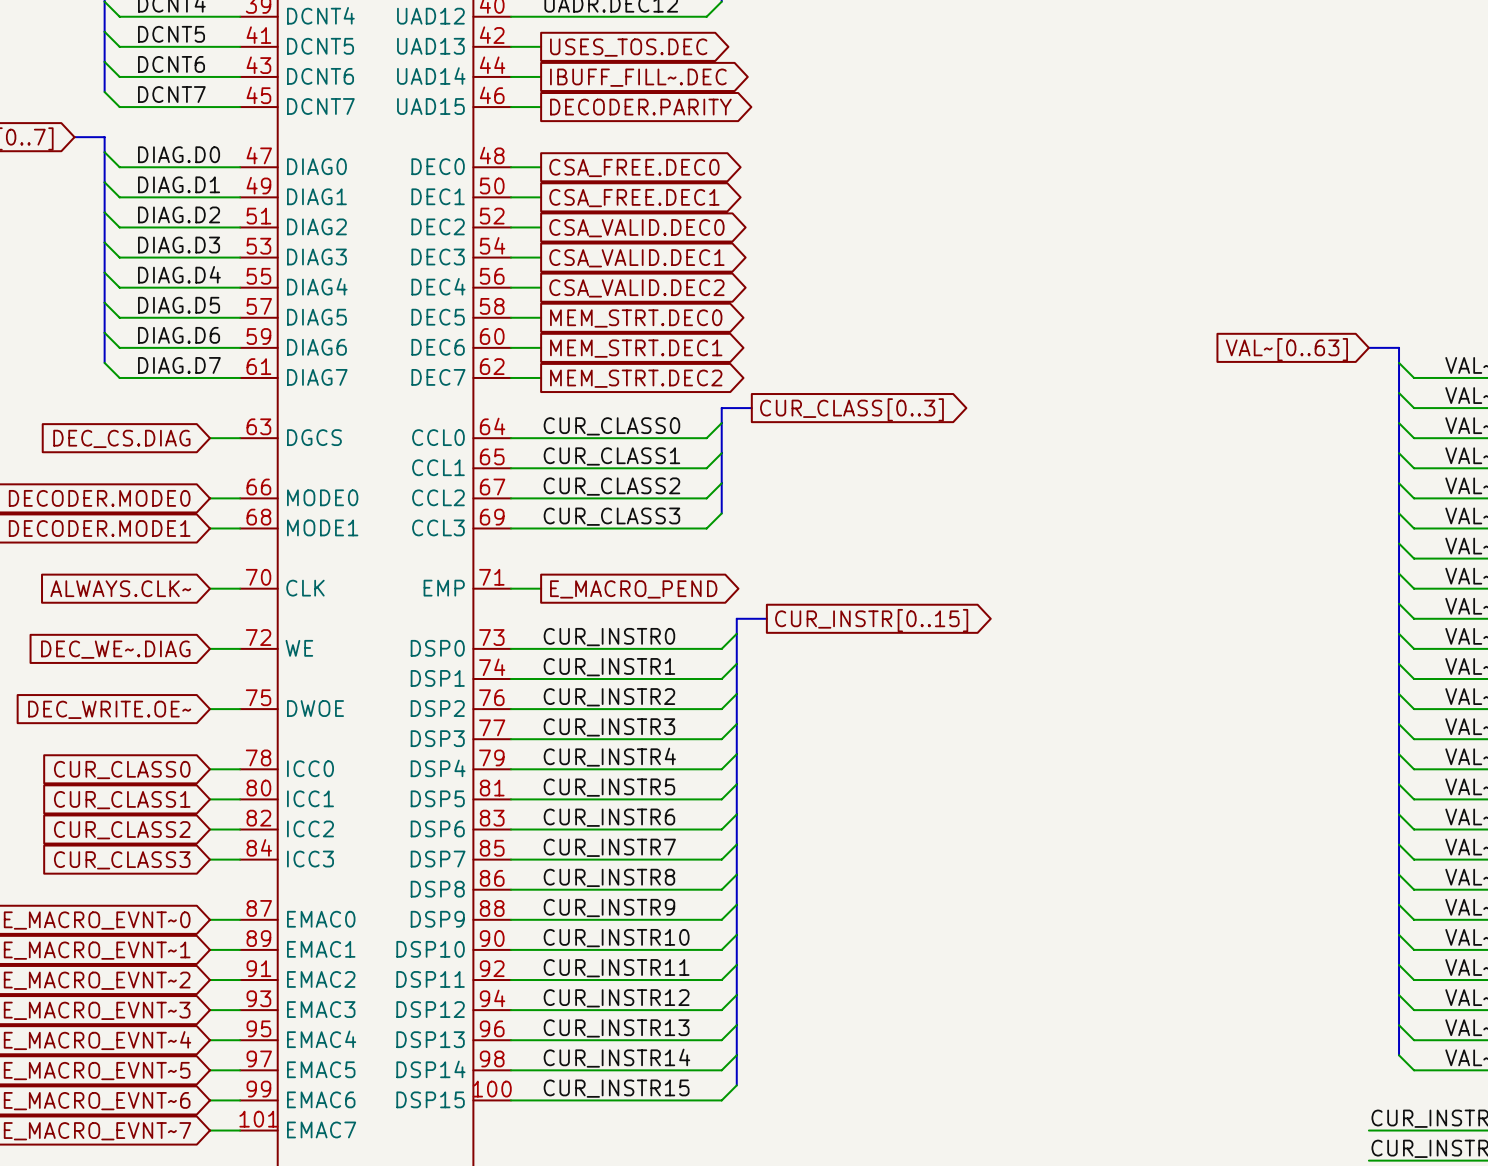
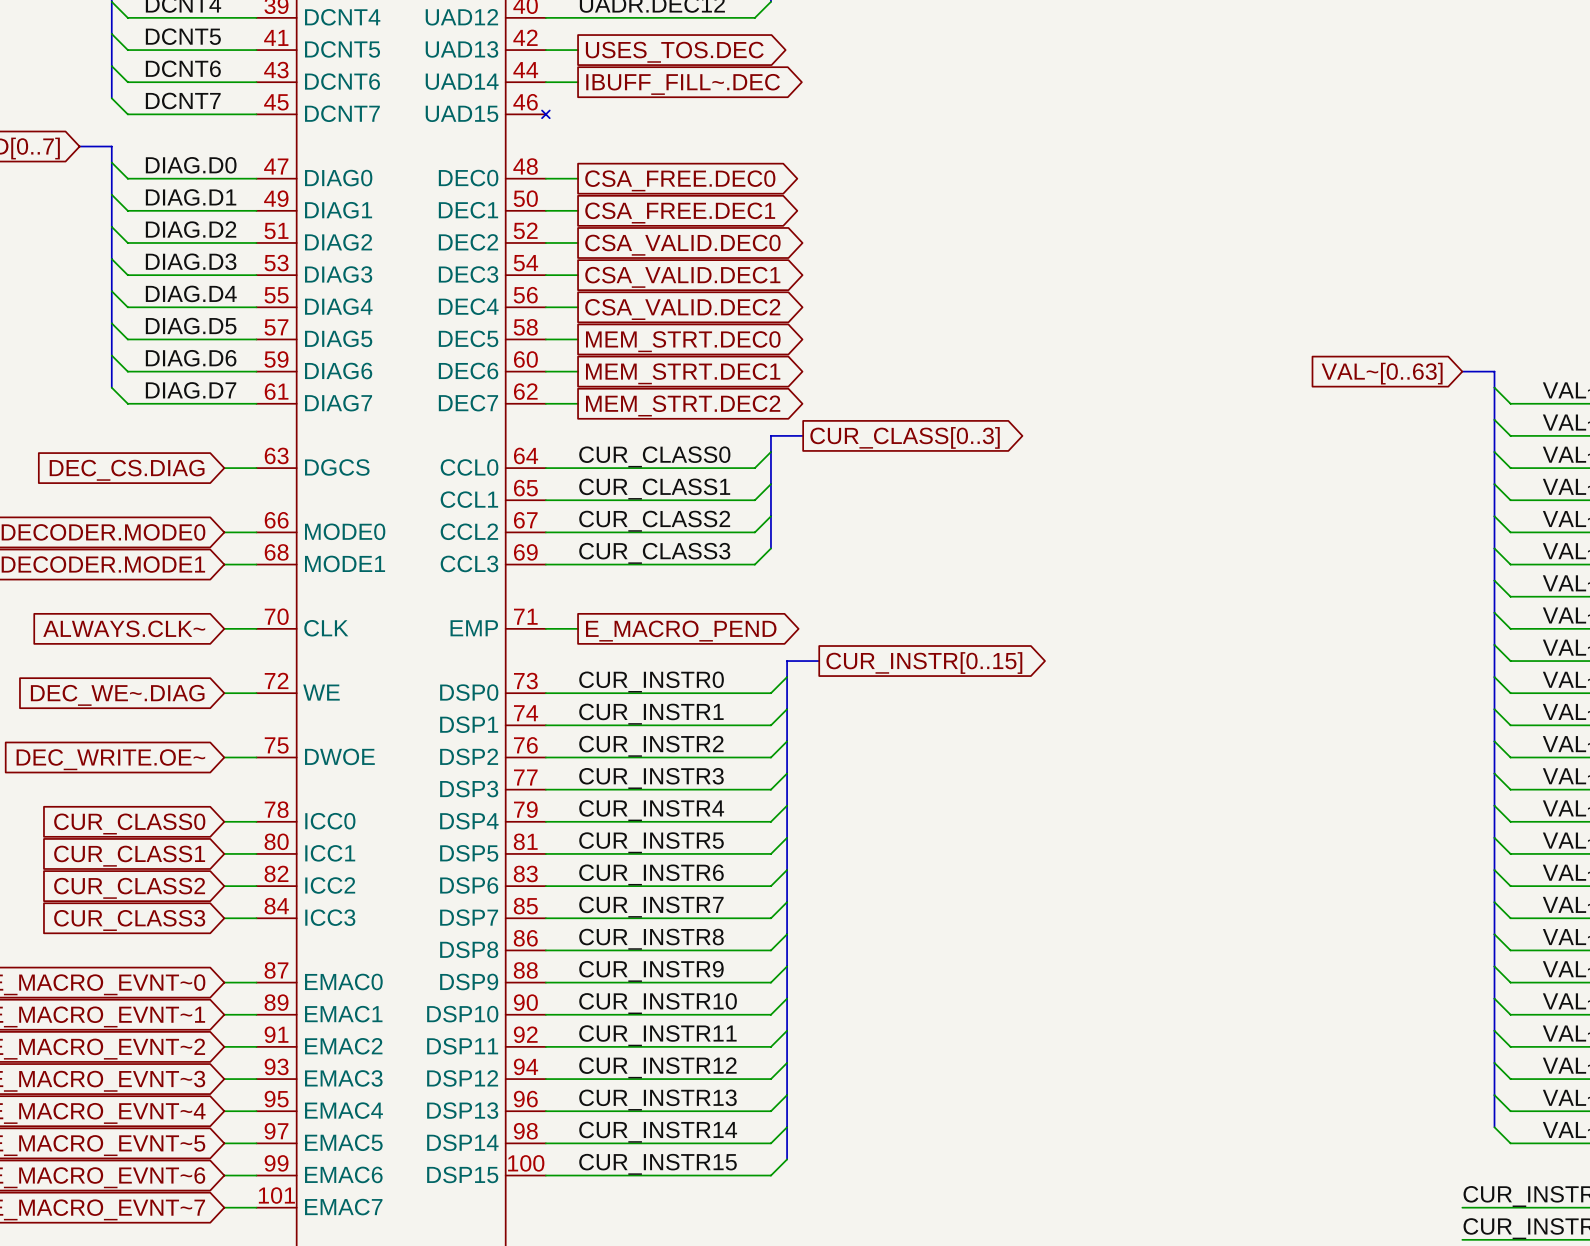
wire: (511, 107) (541, 107) -> none
no-connect mark: none -> (545, 114)
global label: DECODER.PARITY (640, 107) -> none

